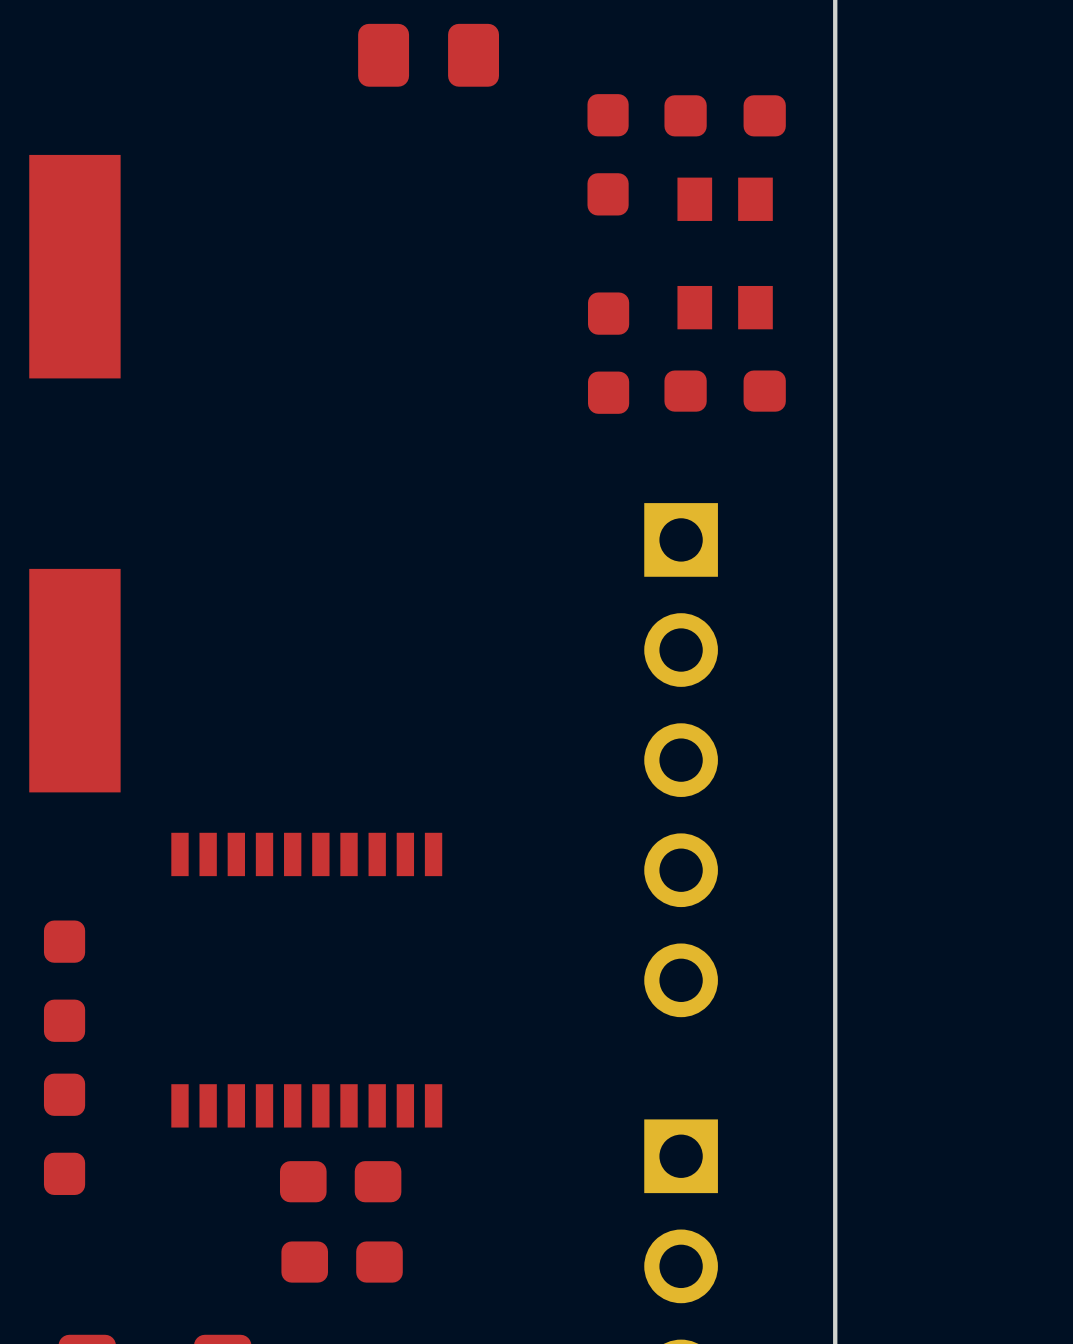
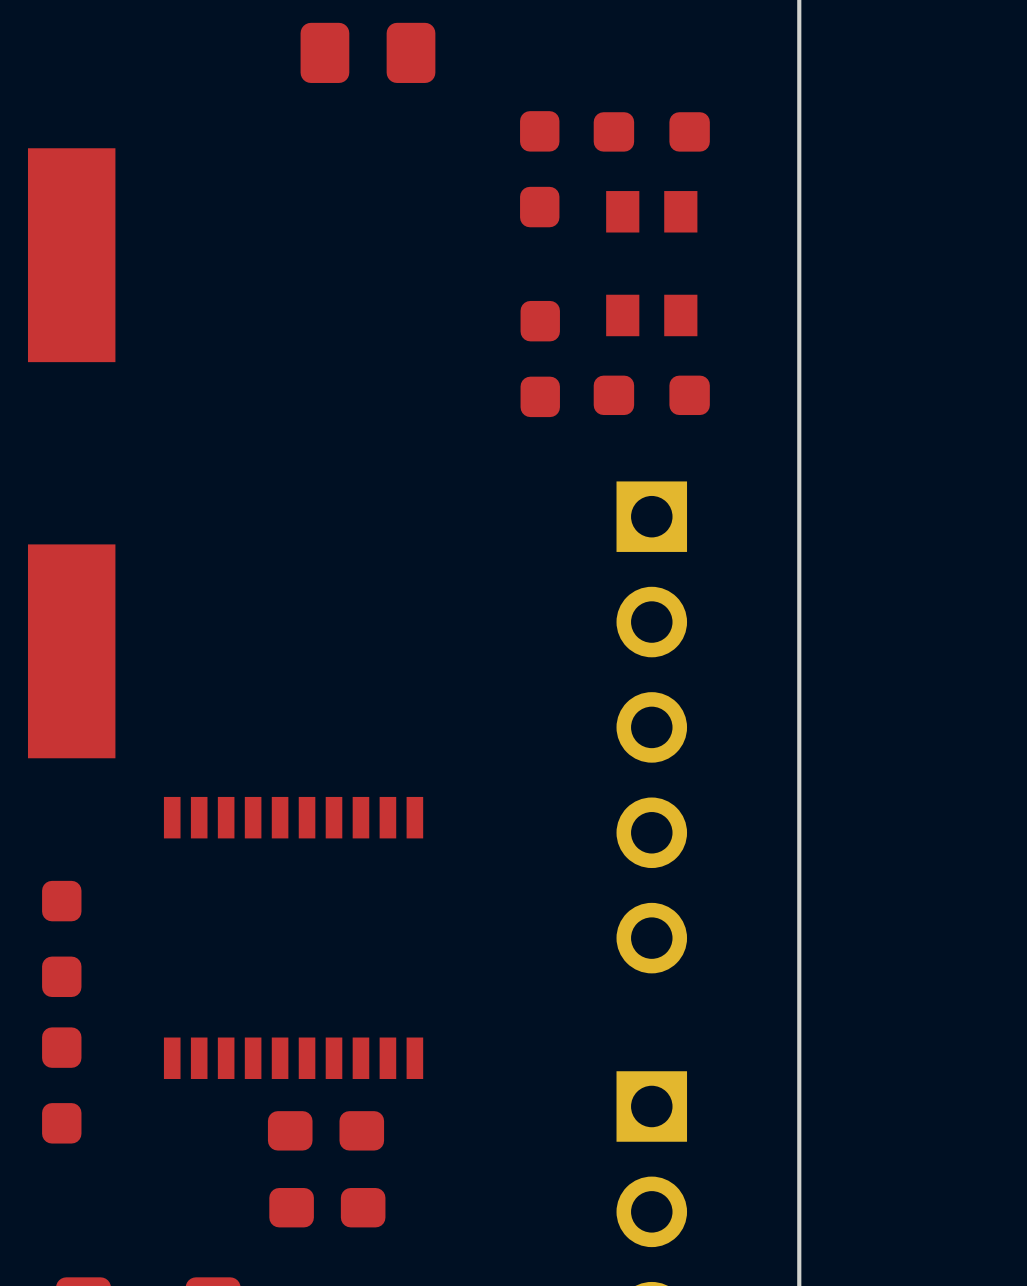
part position: (428, 55) -> (367, 52)
part: (725, 115) -> none
part: none -> (651, 131)
part: (608, 154) -> none
part: none -> (539, 169)
part position: (725, 253) -> (651, 263)
part: (608, 353) -> none
part: none -> (540, 359)
part: (725, 391) -> none
part: none -> (651, 395)

